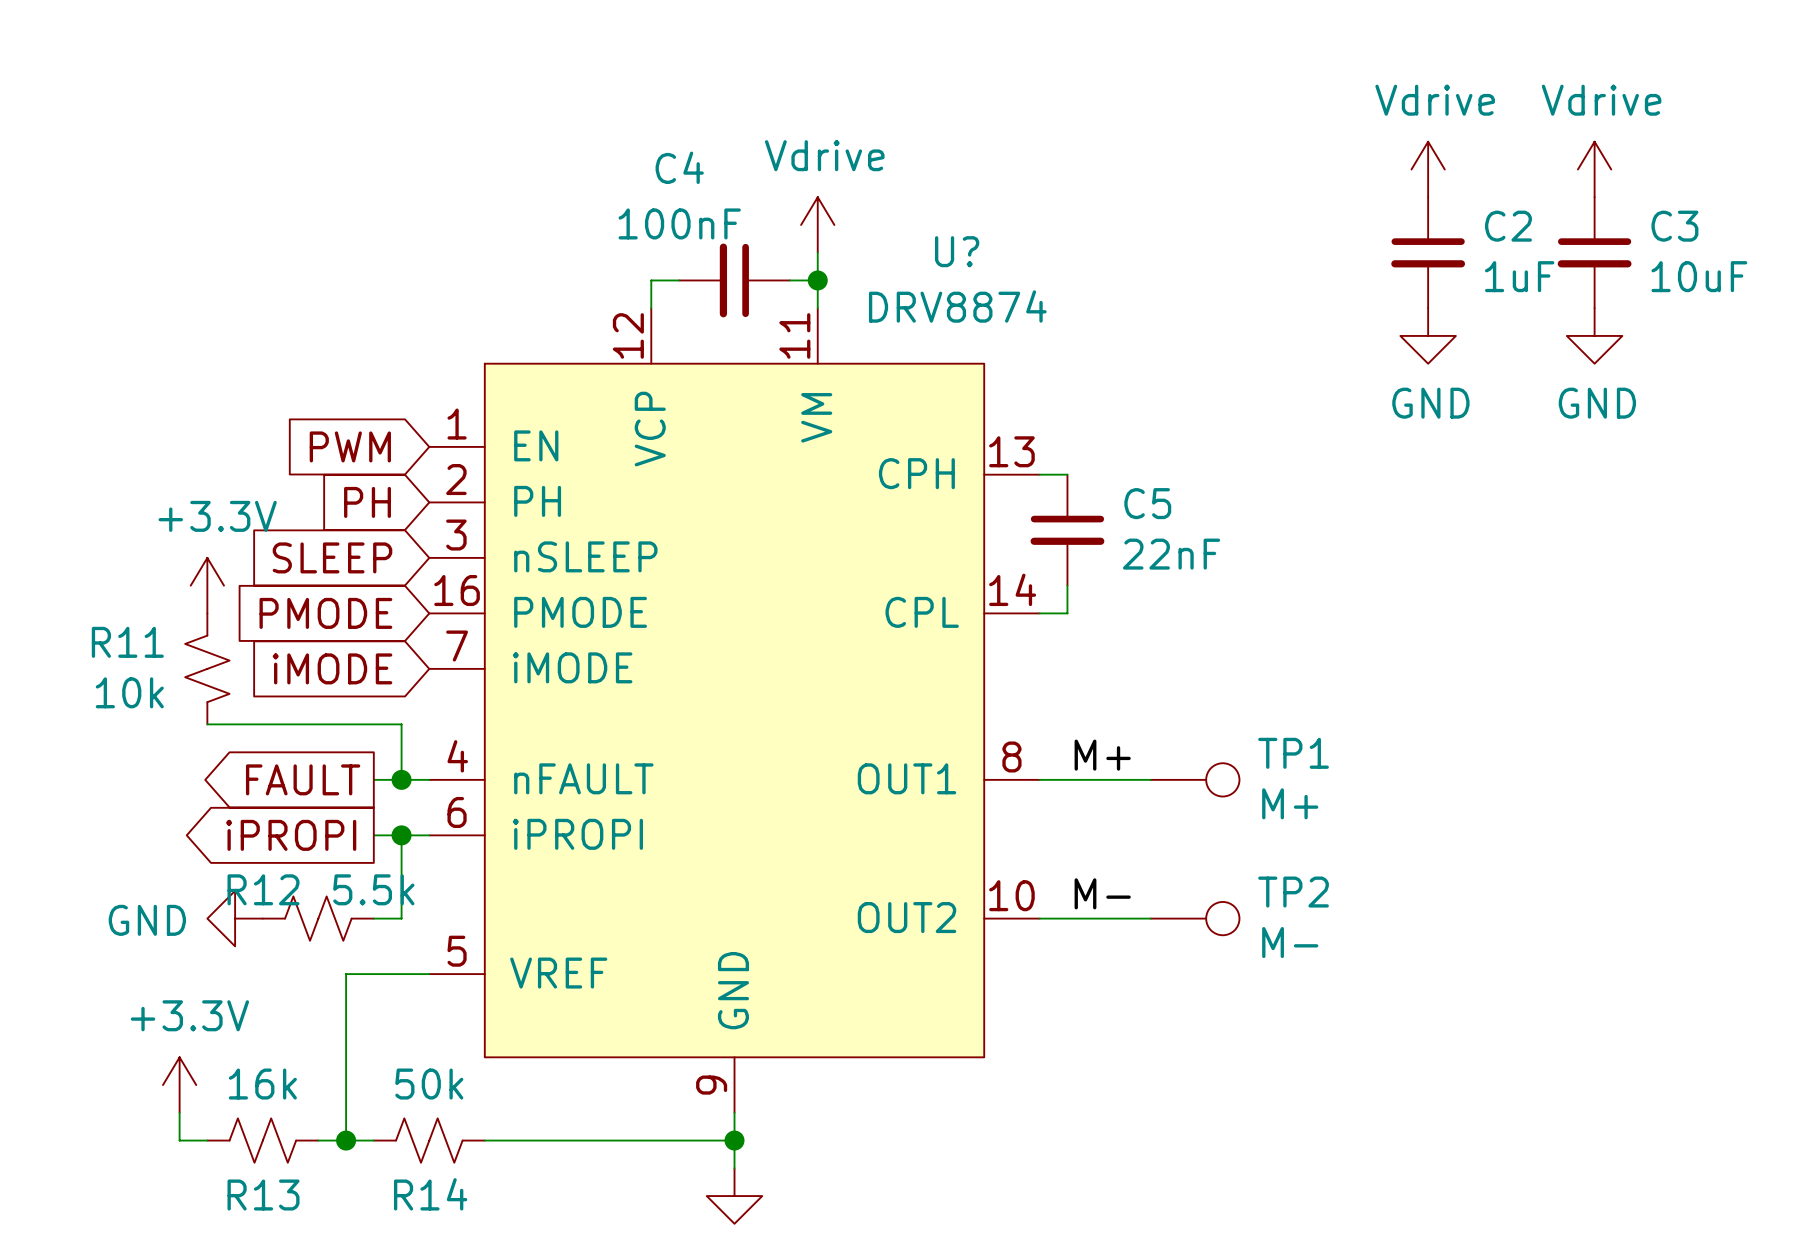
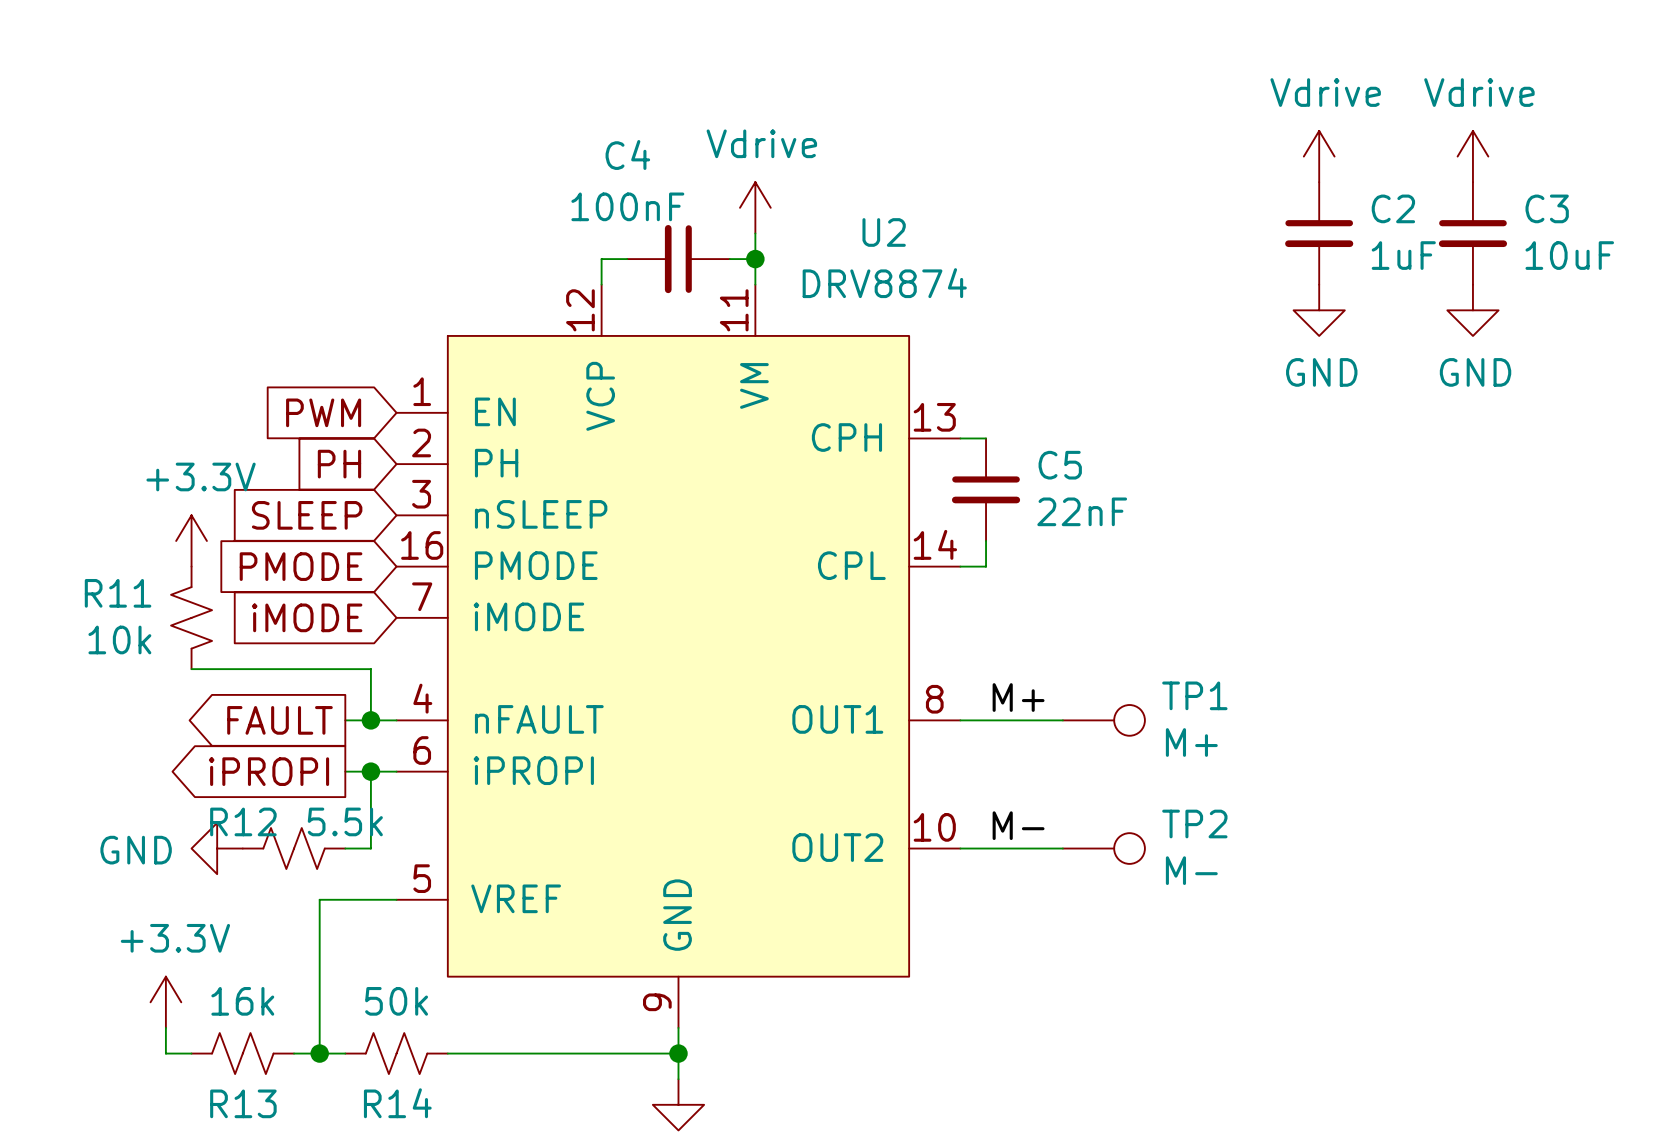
U? name: U? (957, 251) -> U2 (884, 232)

